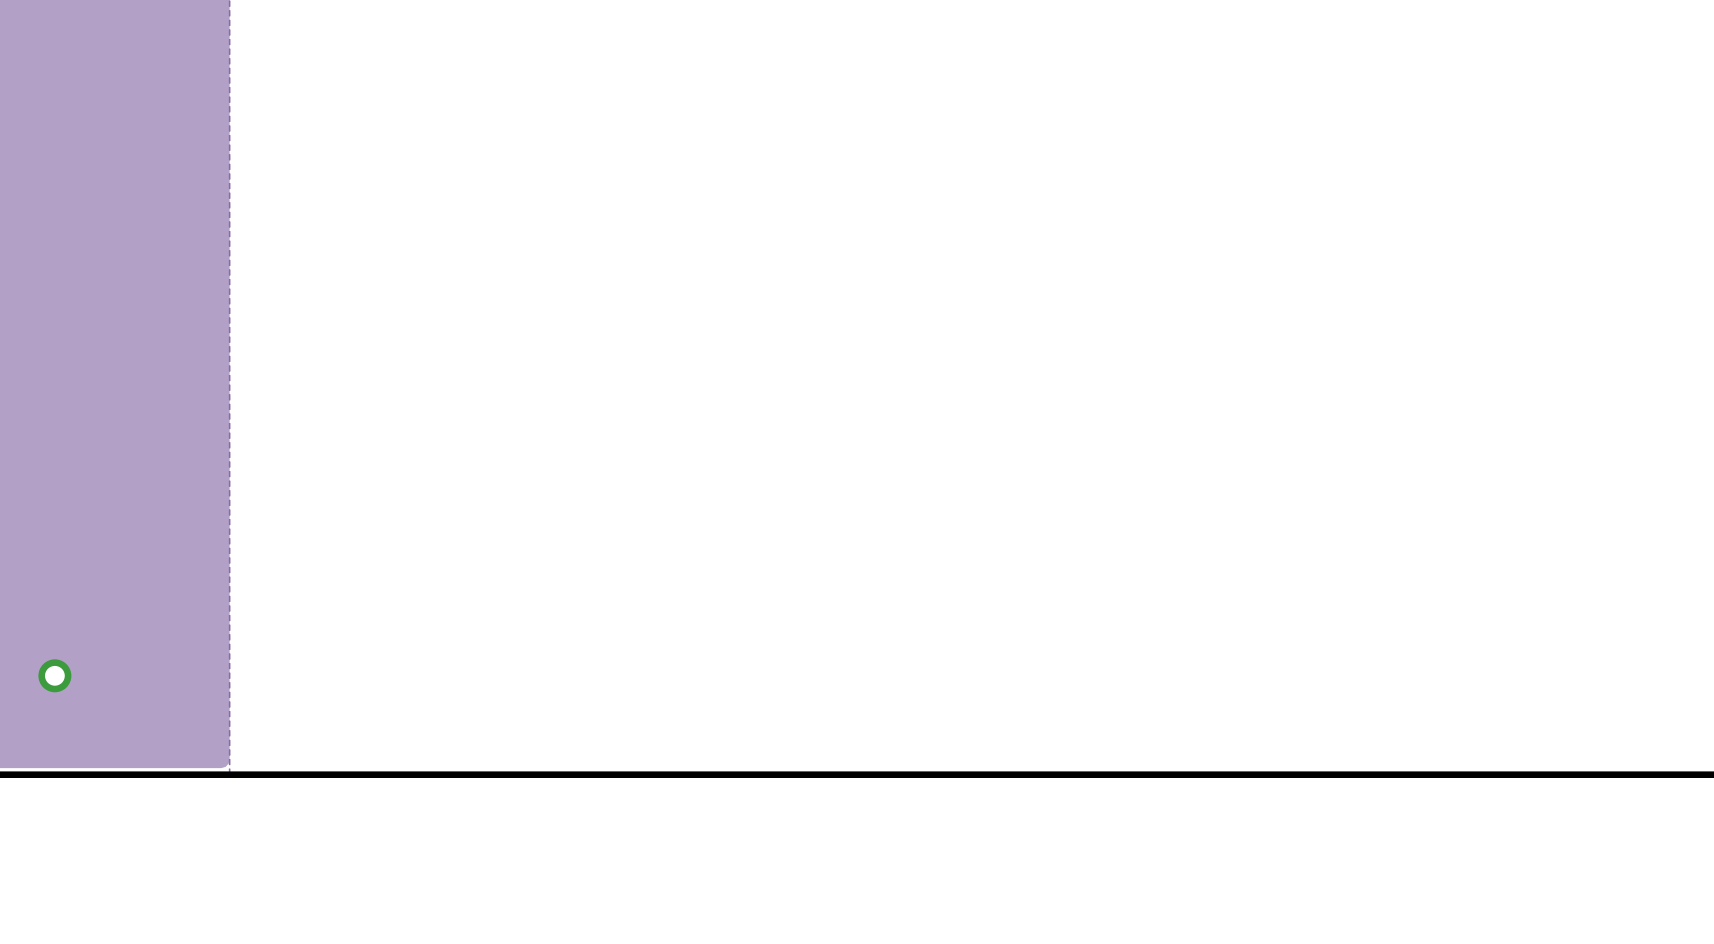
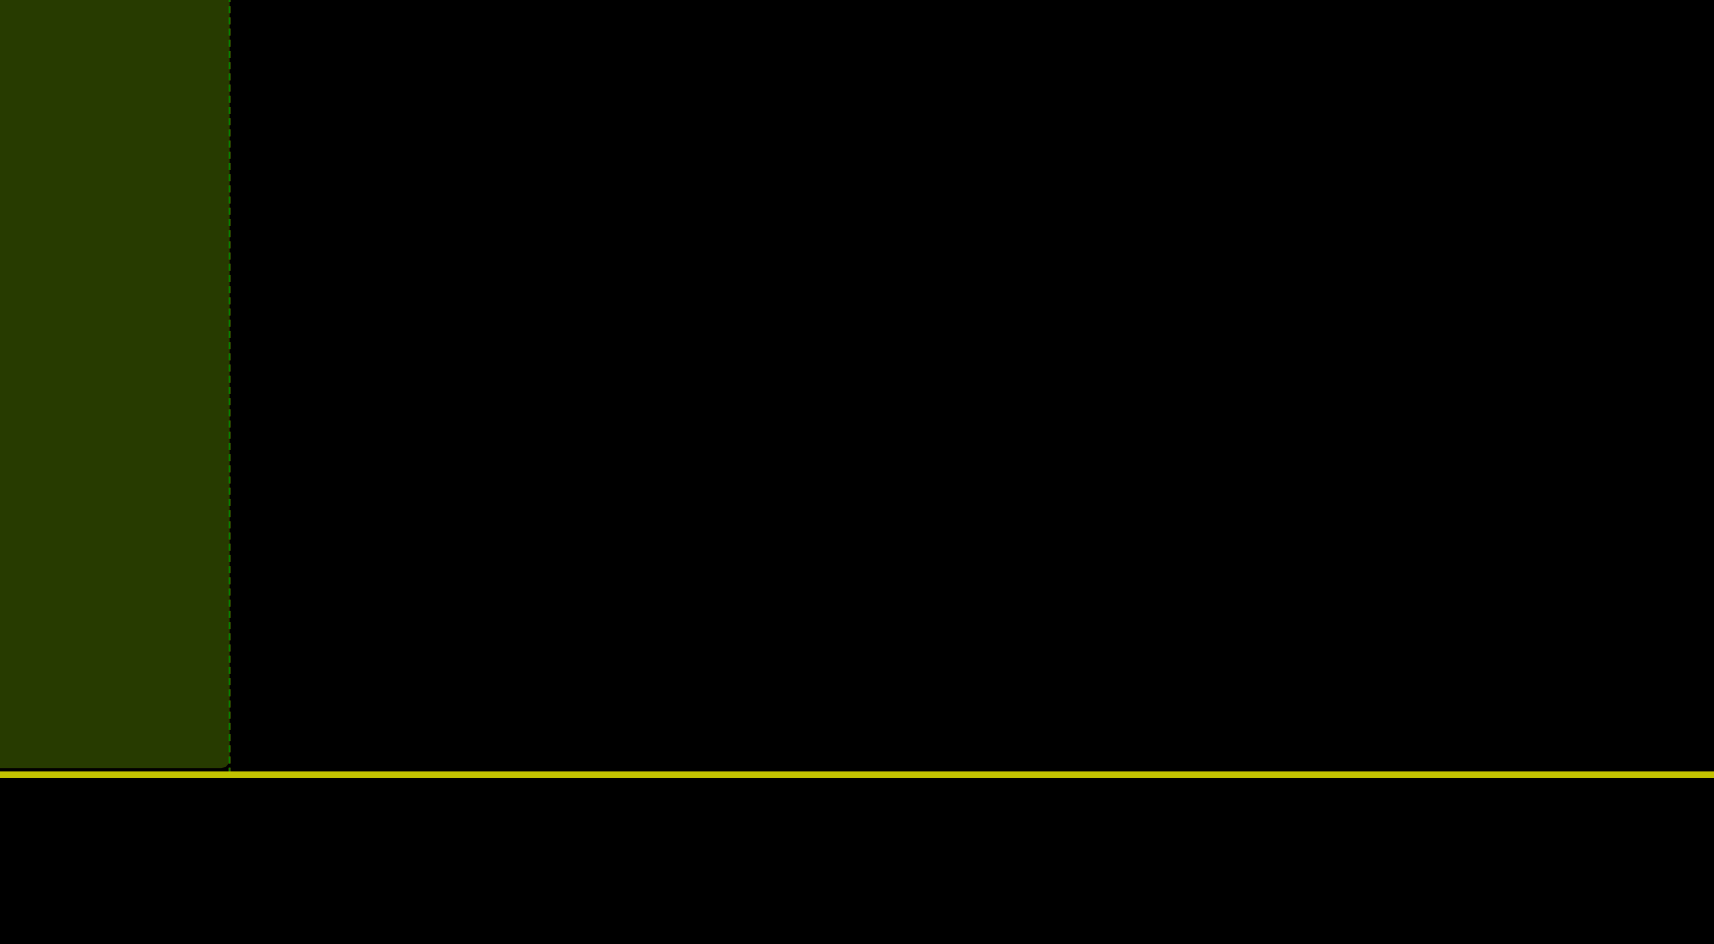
via: (54, 675) -> none

